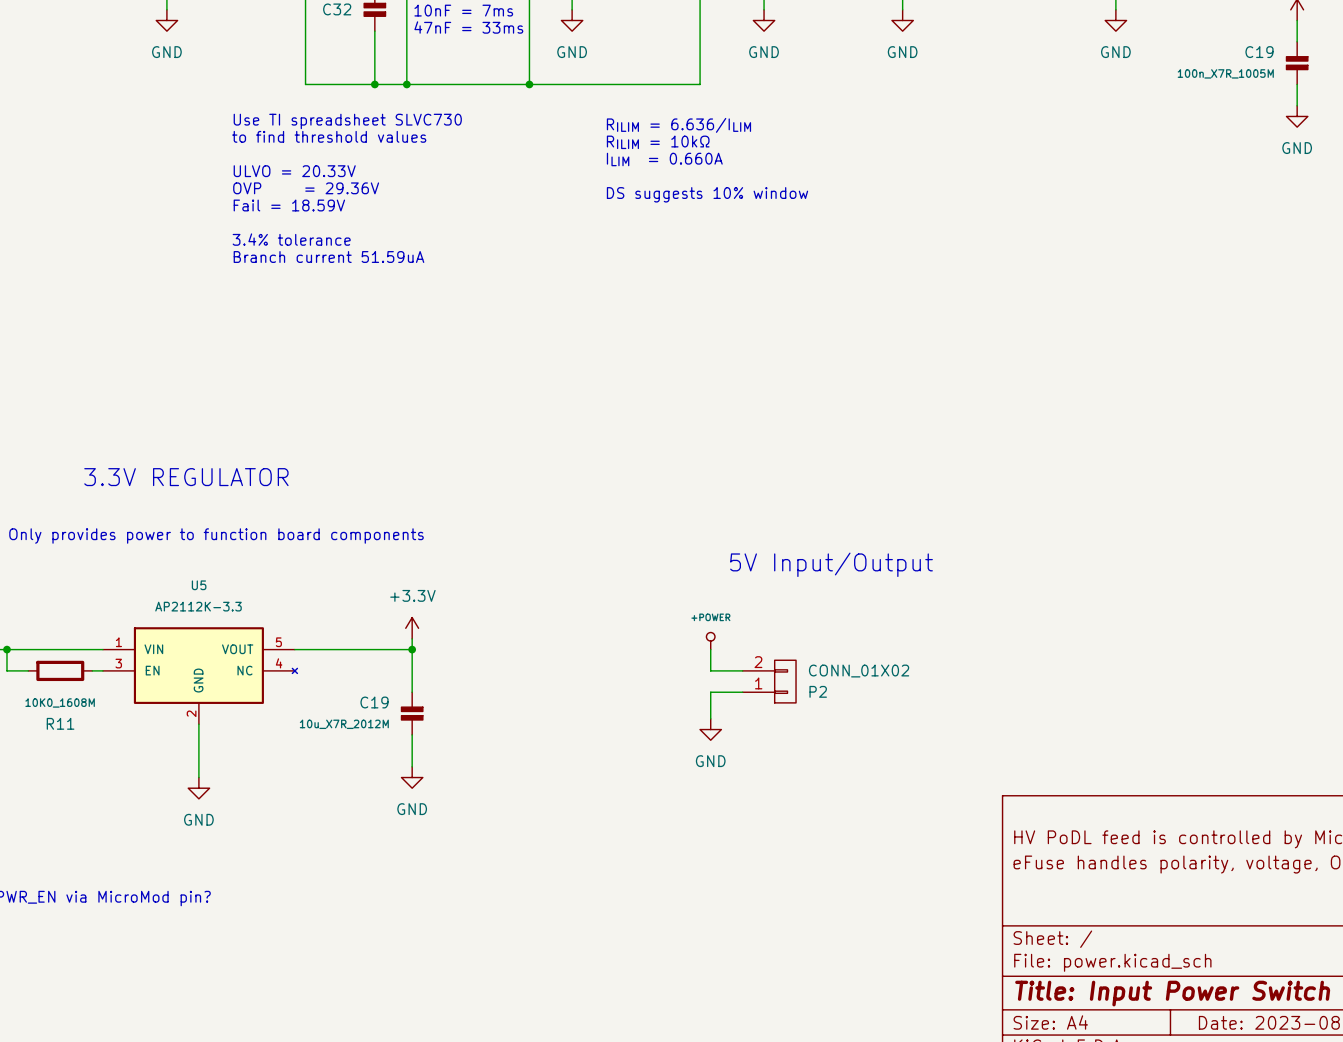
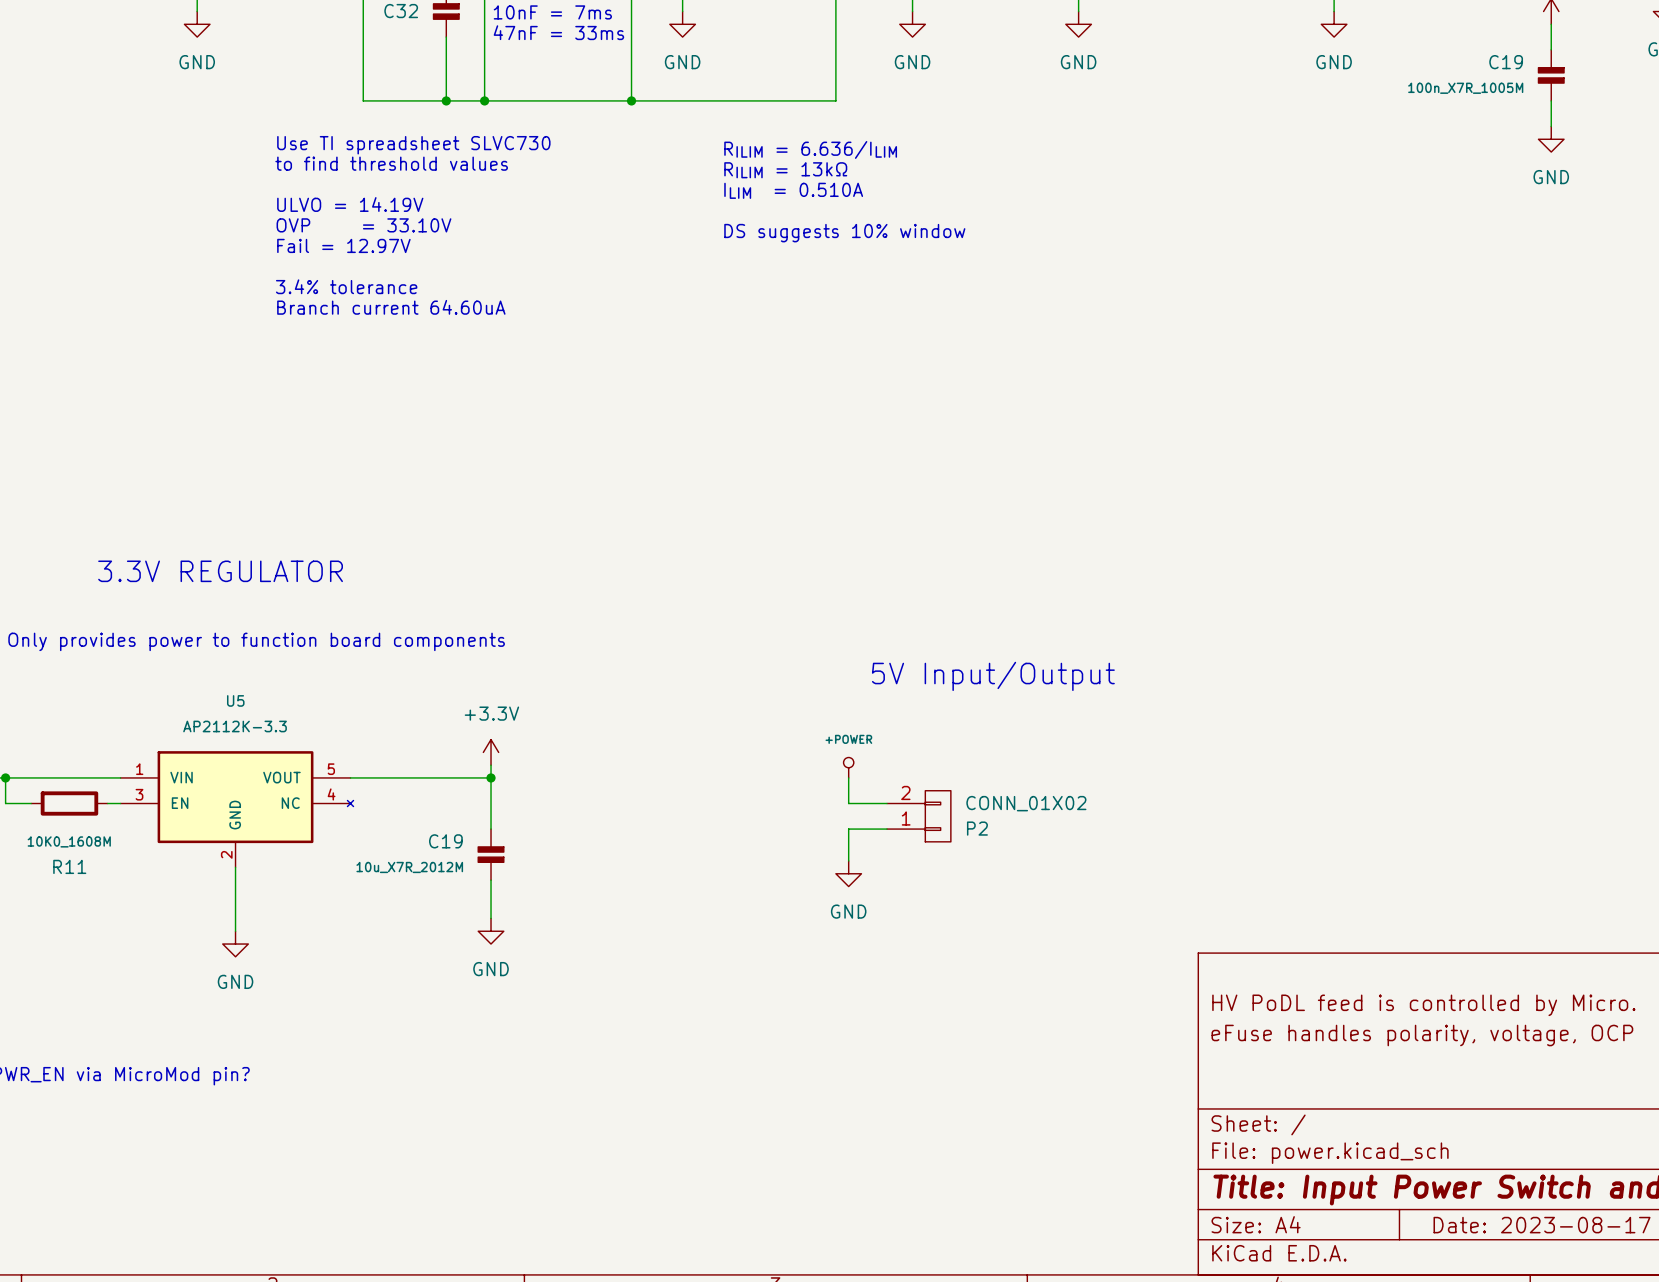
text: RILIM = 10kΩ (658, 142) -> RILIM = 13kΩ (785, 170)
text: ILIM = 0.660A (664, 159) -> ILIM = 0.510A (793, 190)
text: ULVO = 20.33V (294, 171) -> ULVO = 14.19V (350, 204)
text: OVP = 29.36V (306, 188) -> OVP = 33.10V (363, 225)
text: Fail = 18.59V (289, 205) -> Fail = 12.97V (343, 245)
text: Branch current 51.59uA (328, 257) -> Branch current 64.60uA (391, 307)

